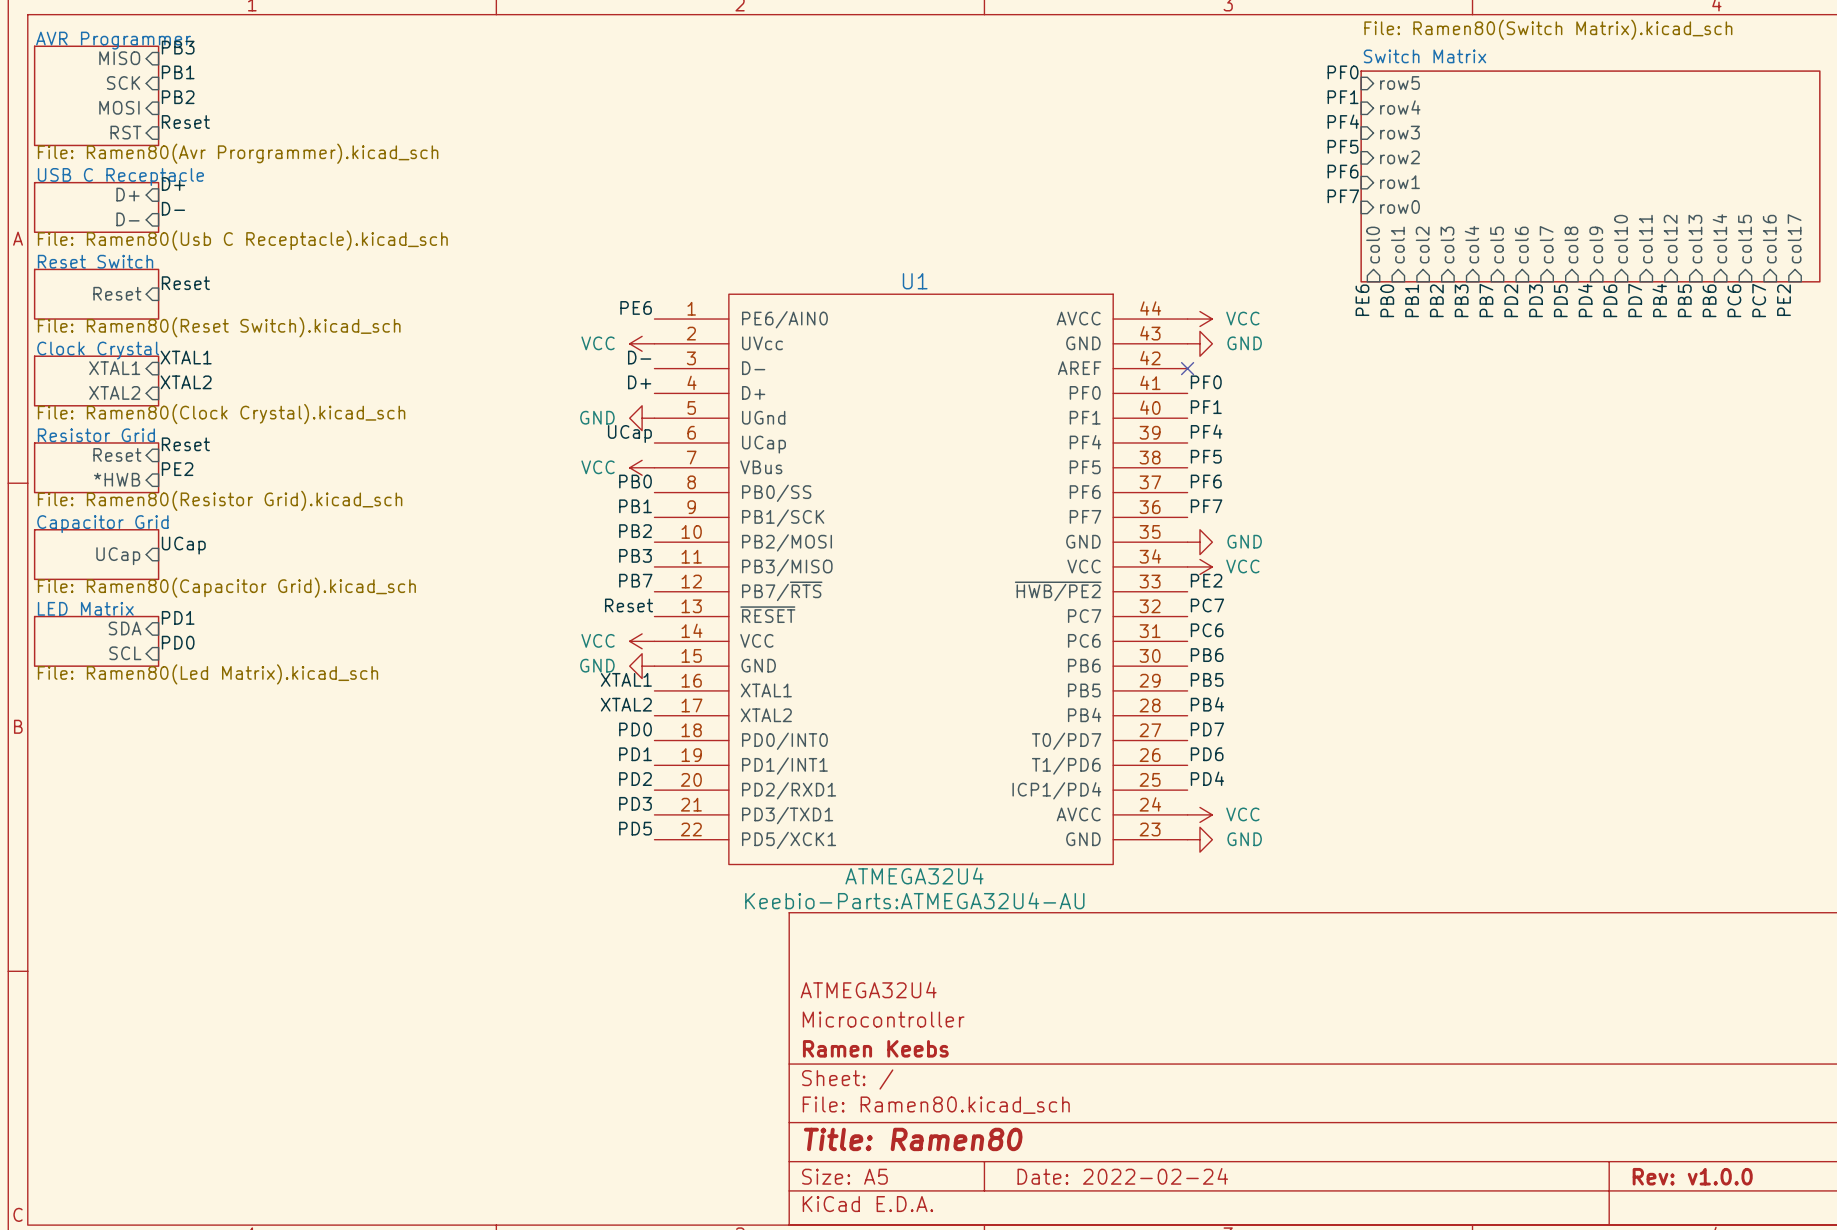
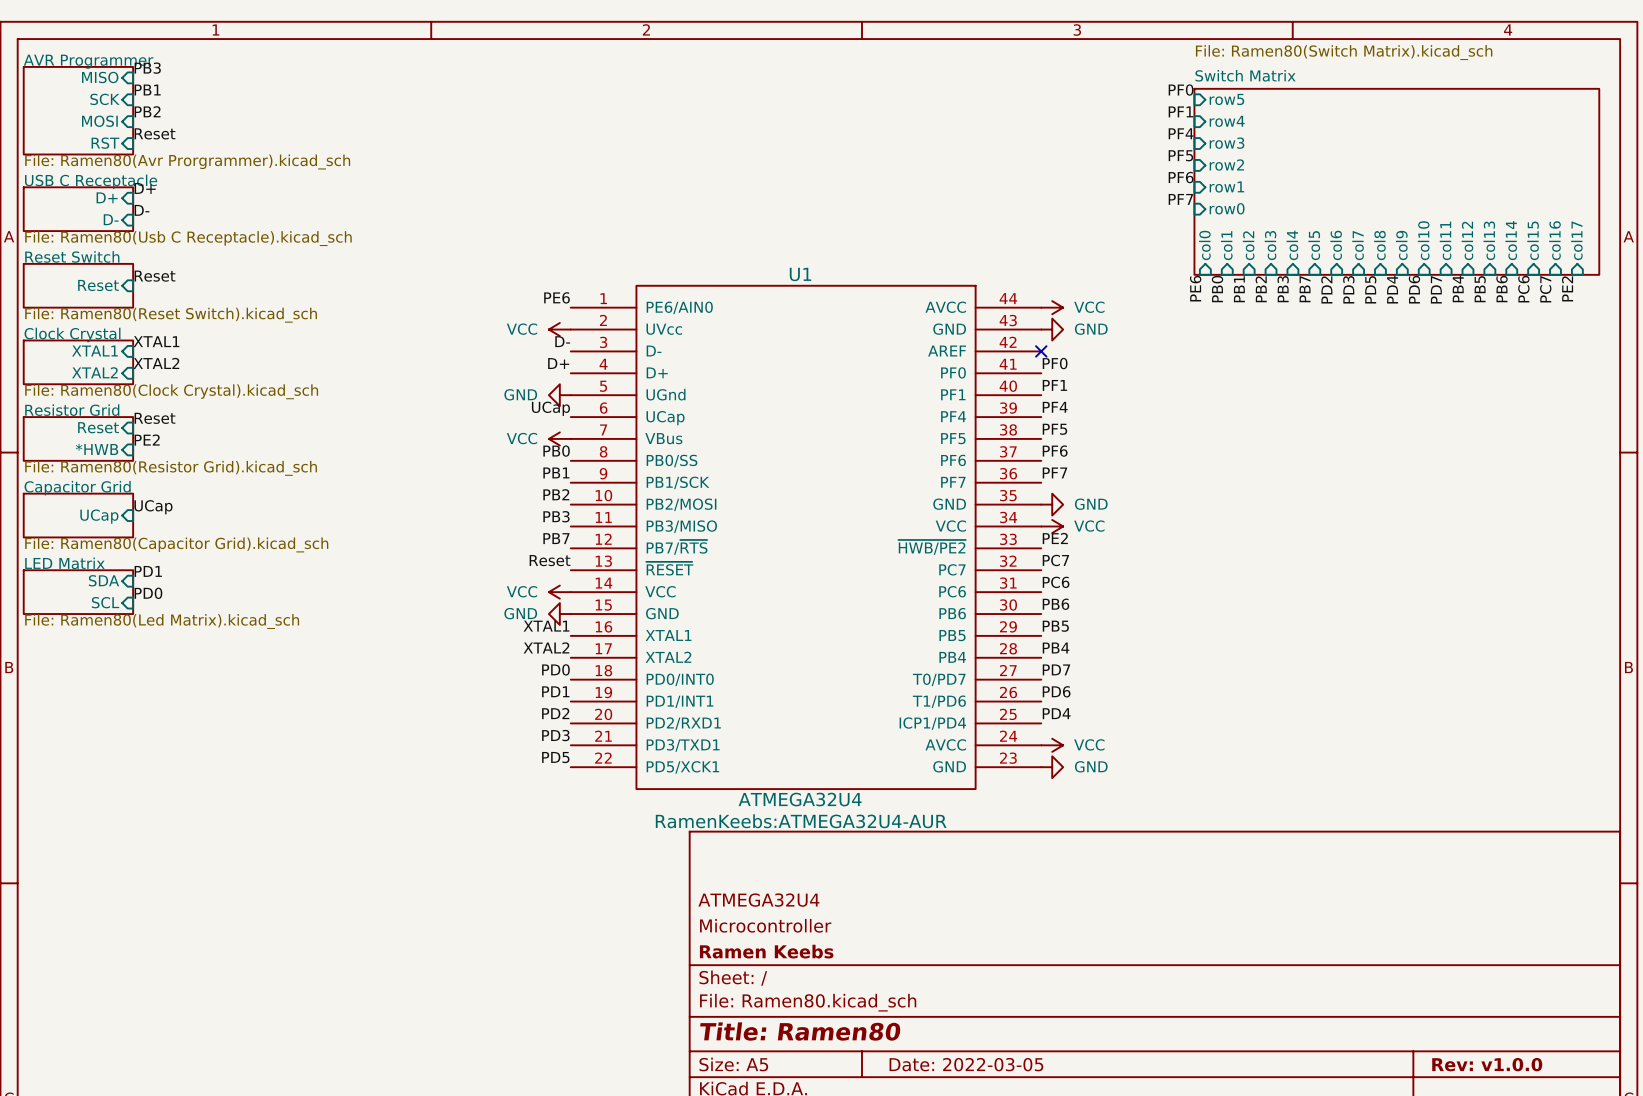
U1 text: Keebio-Parts:ATMEGA32U4-AU (914, 900) -> RamenKeebs:ATMEGA32U4-AUR (801, 821)
title block: Date: 2022-02-24 (1122, 1176) -> Date: 2022-03-05 (966, 1064)

